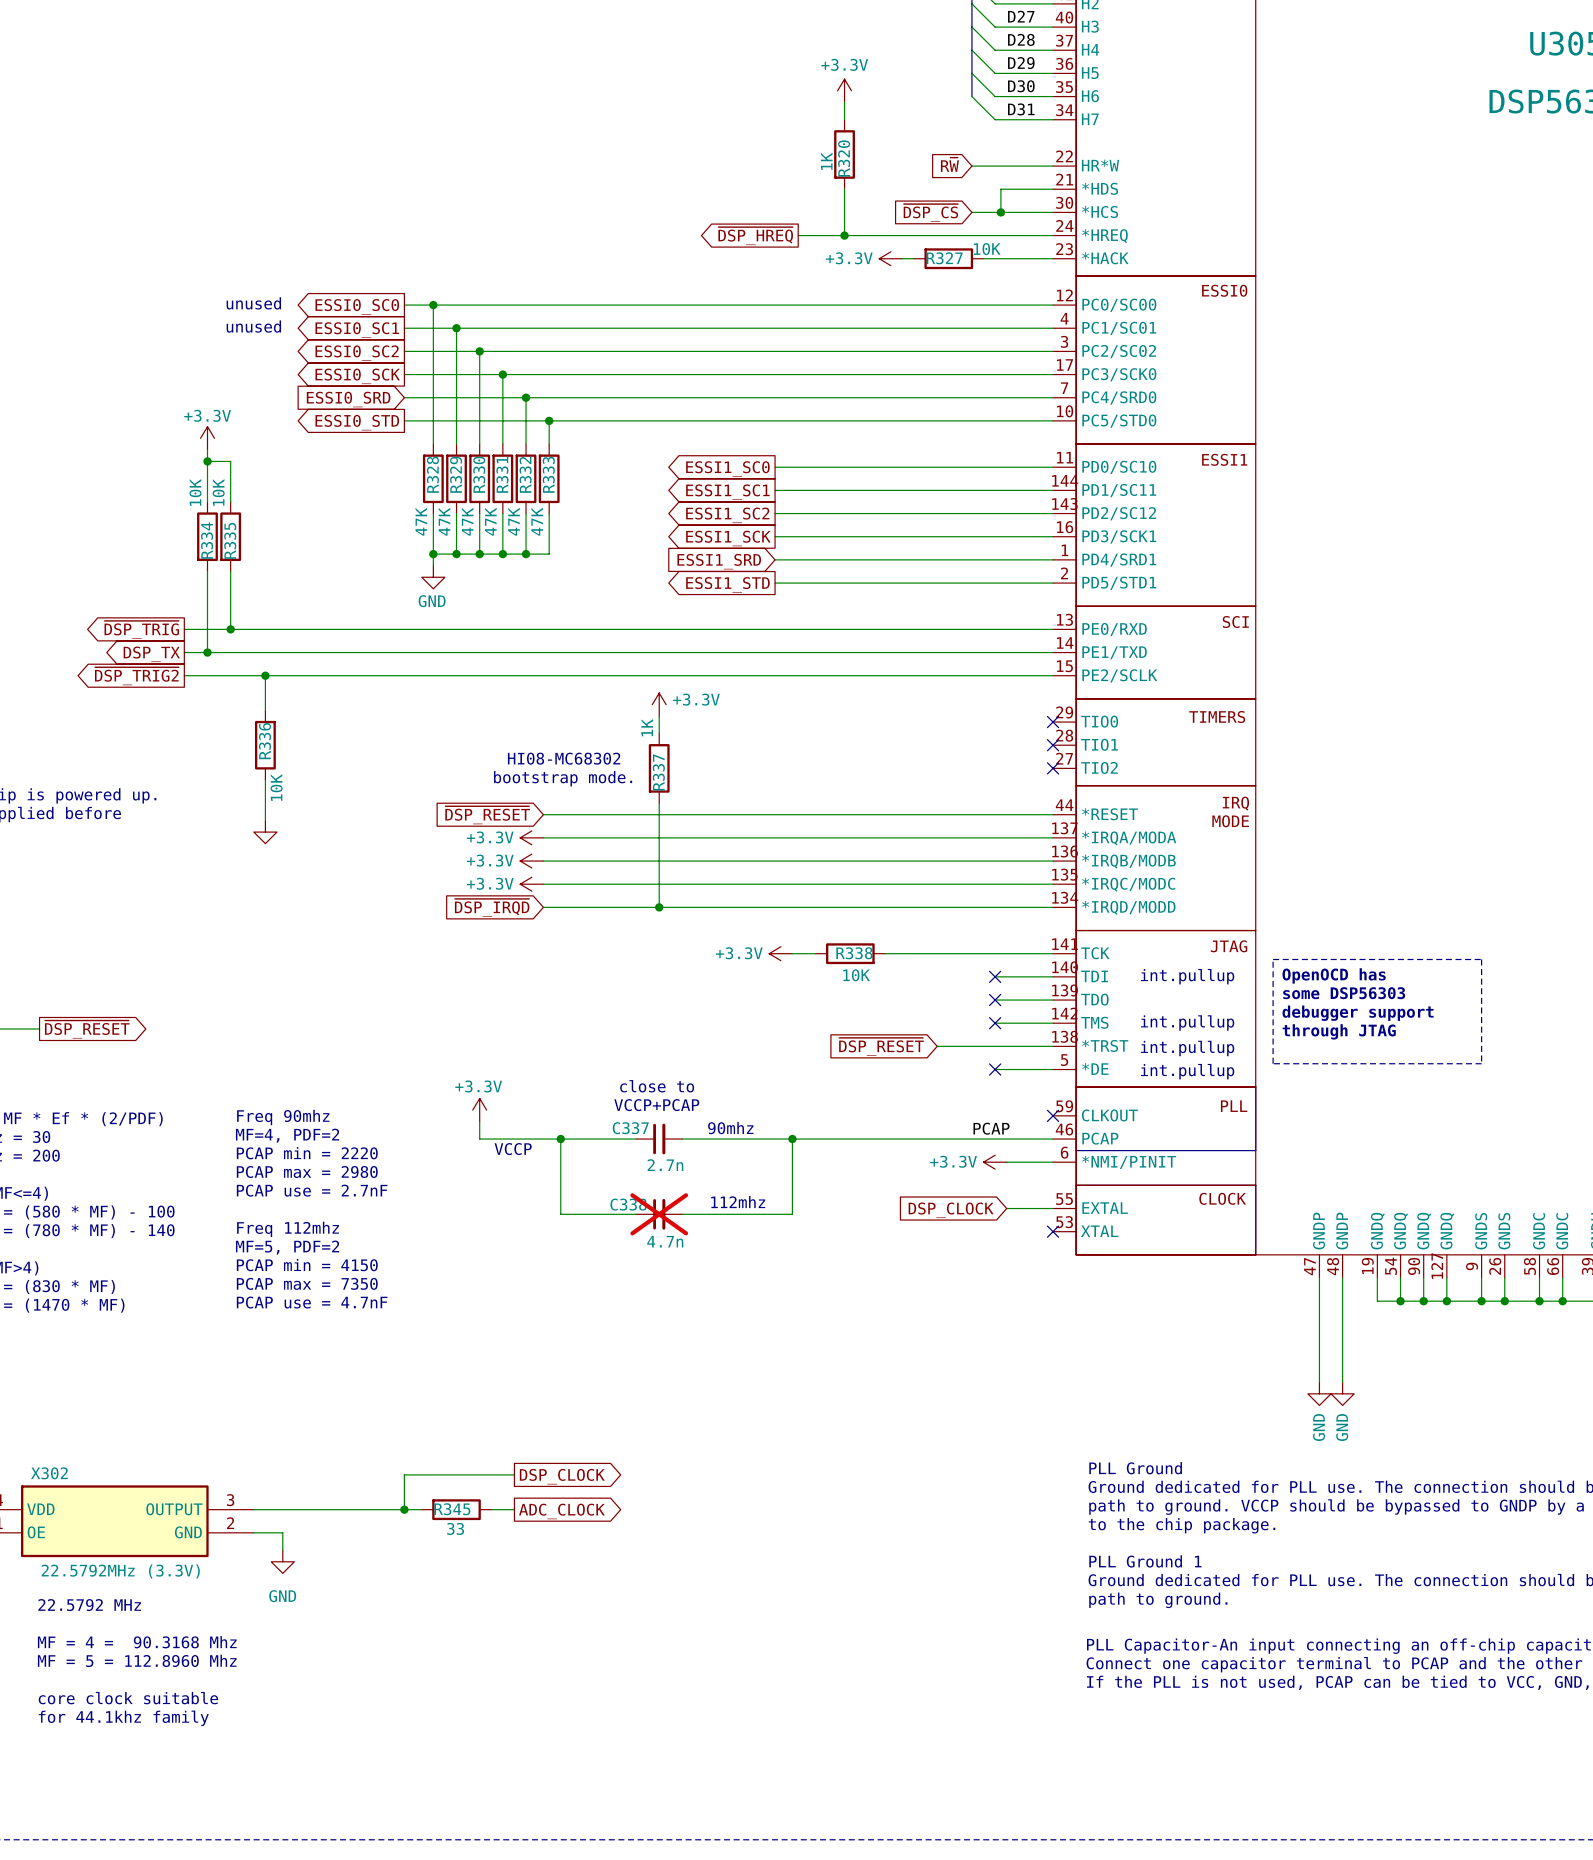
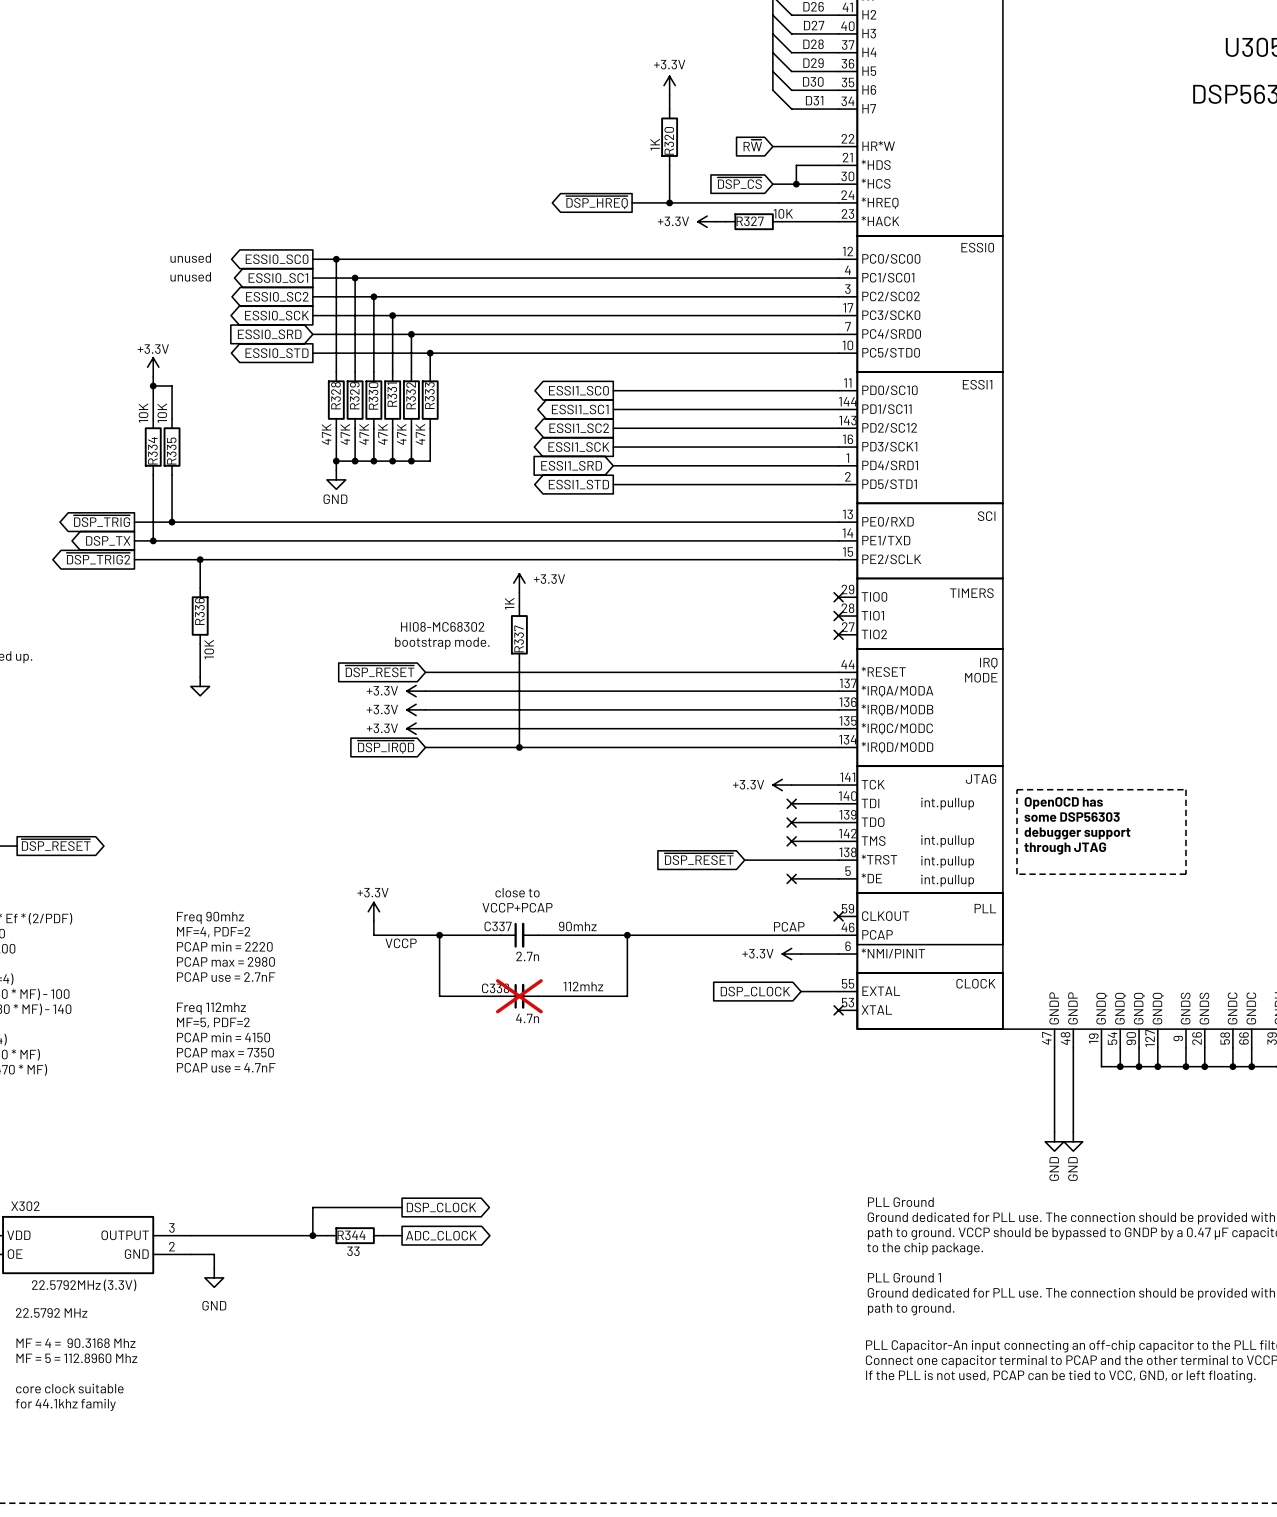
power symbol position: +3.3V (780, 953) -> +3.3V (782, 785)
wire: (792, 953) (815, 953) -> none
R338: 10K (850, 953) -> none
wire: (885, 953) (995, 953) -> none
R345 name: R345 (452, 1509) -> R344 (351, 1235)

